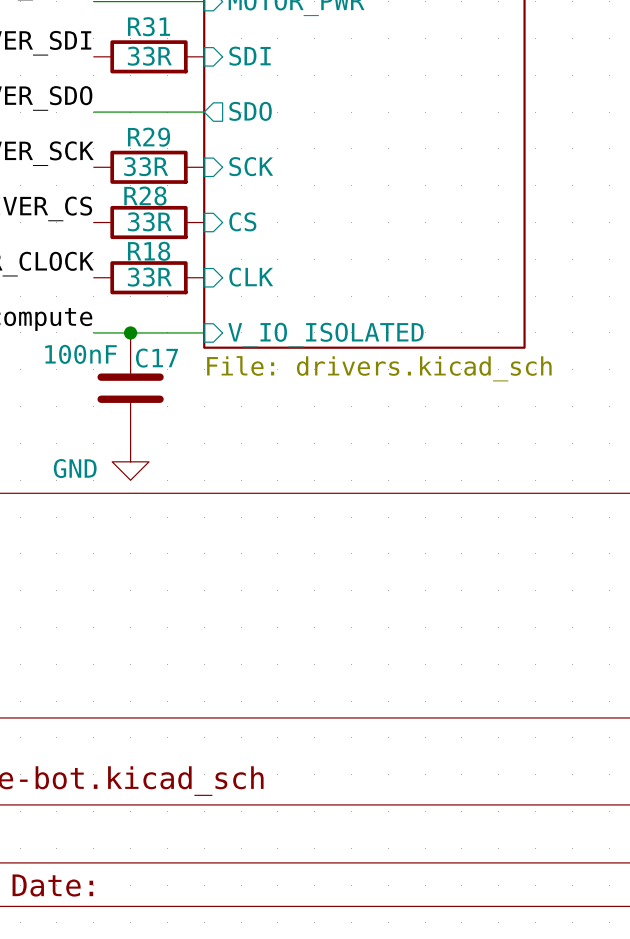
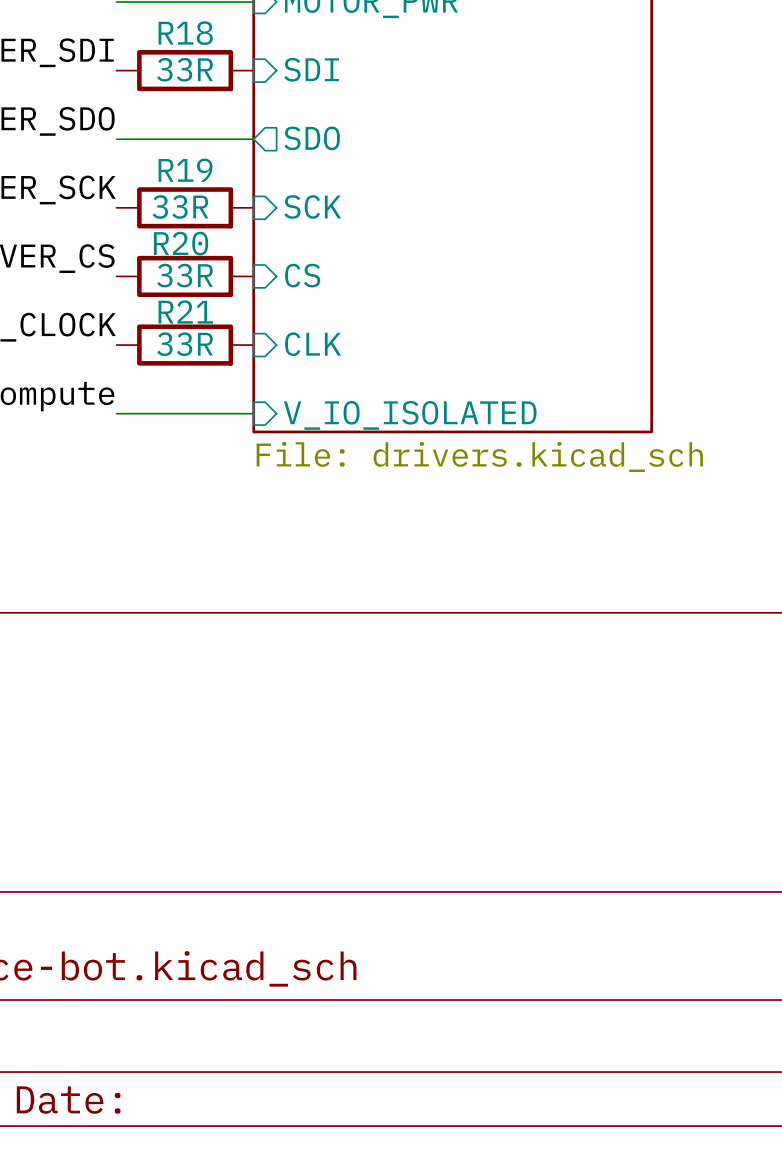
R31 name: R31 (149, 26) -> R18 (185, 33)
R29 name: R29 (149, 137) -> R19 (185, 170)
R28 name: R28 (145, 196) -> R20 (181, 243)
R18 name: R18 (149, 251) -> R21 (185, 311)
junction: (130, 332) -> none
C17: 100nF (130, 388) -> none
power symbol: GND (130, 461) -> none

